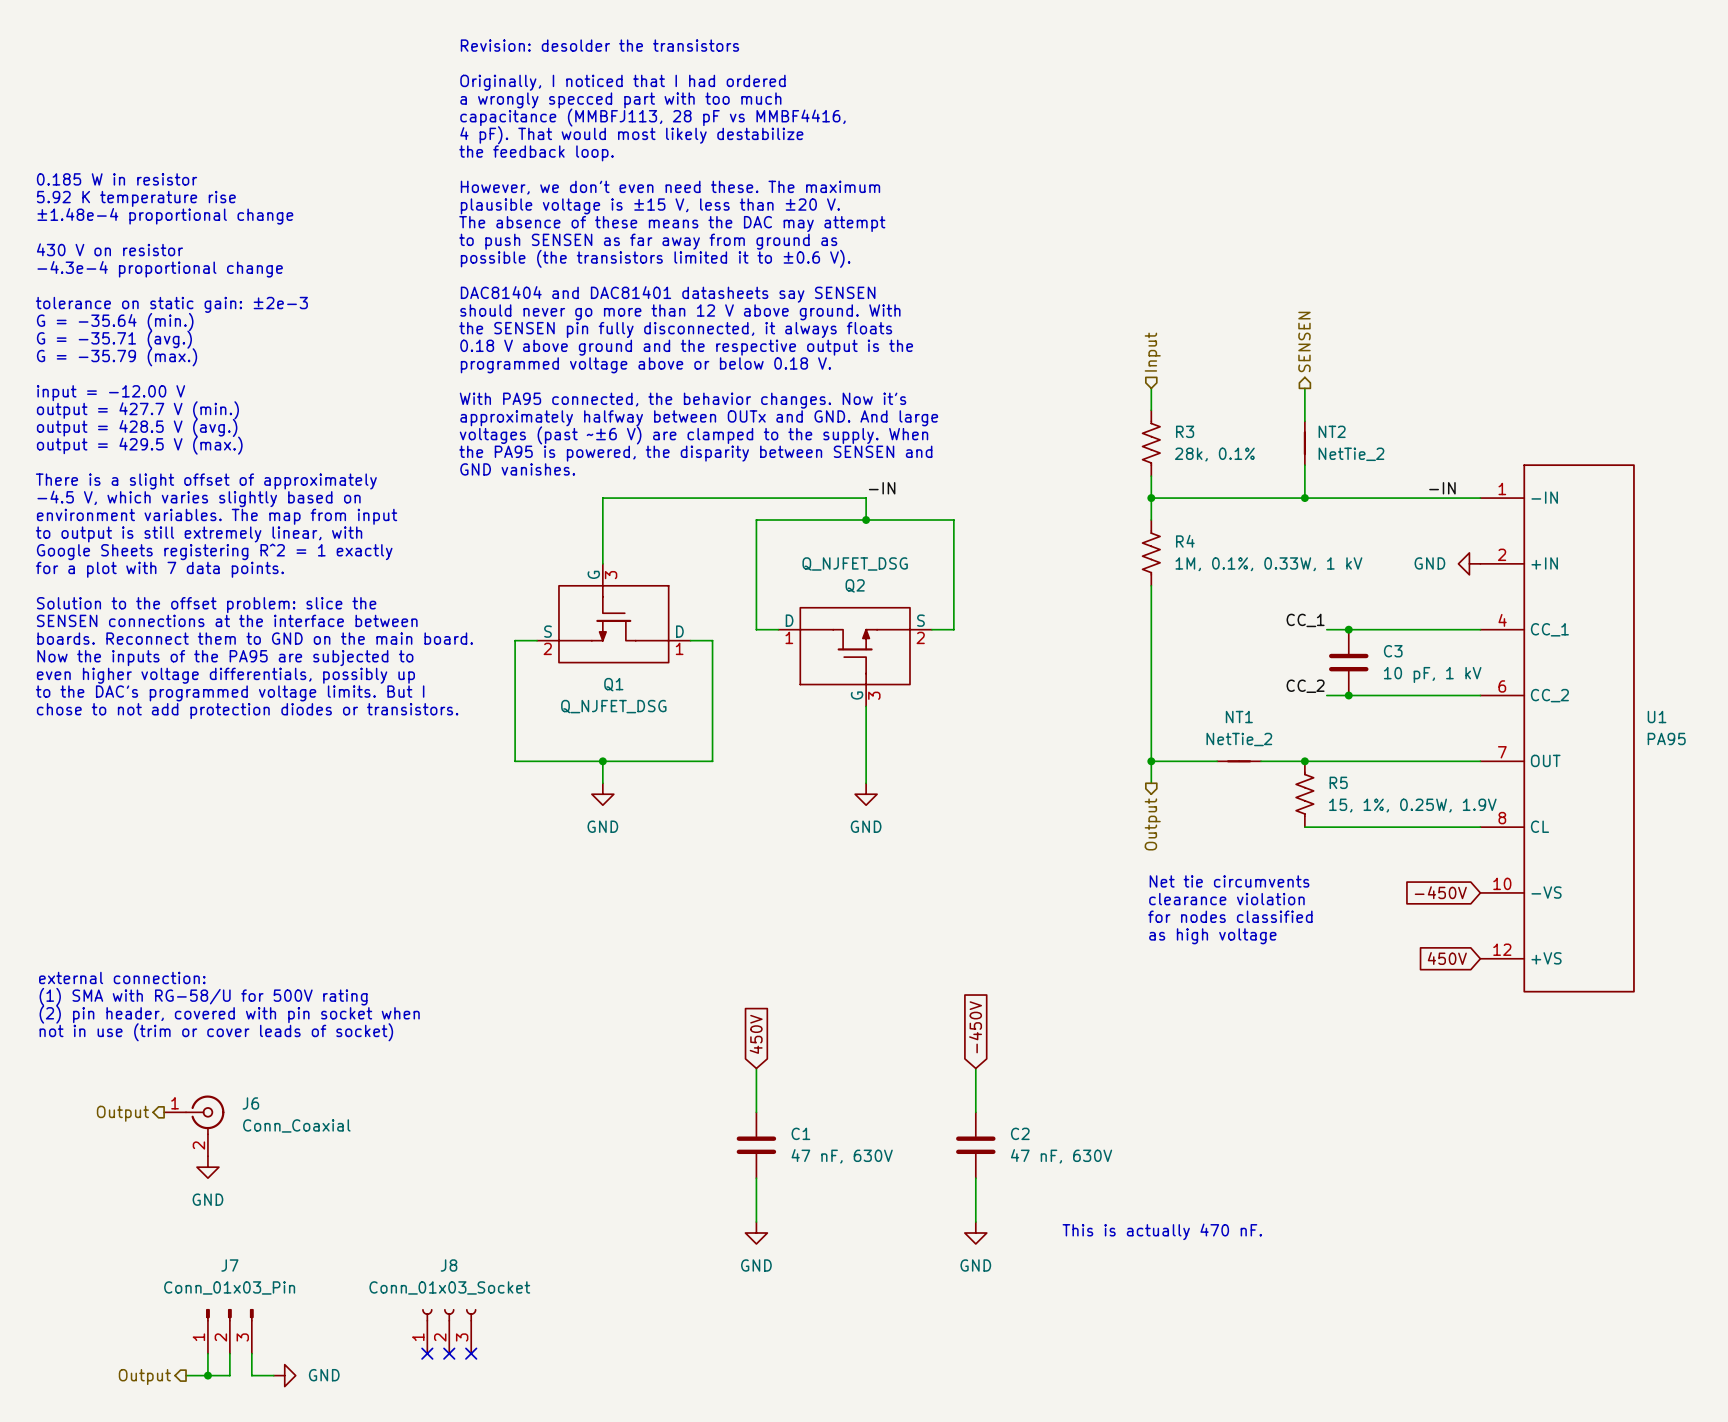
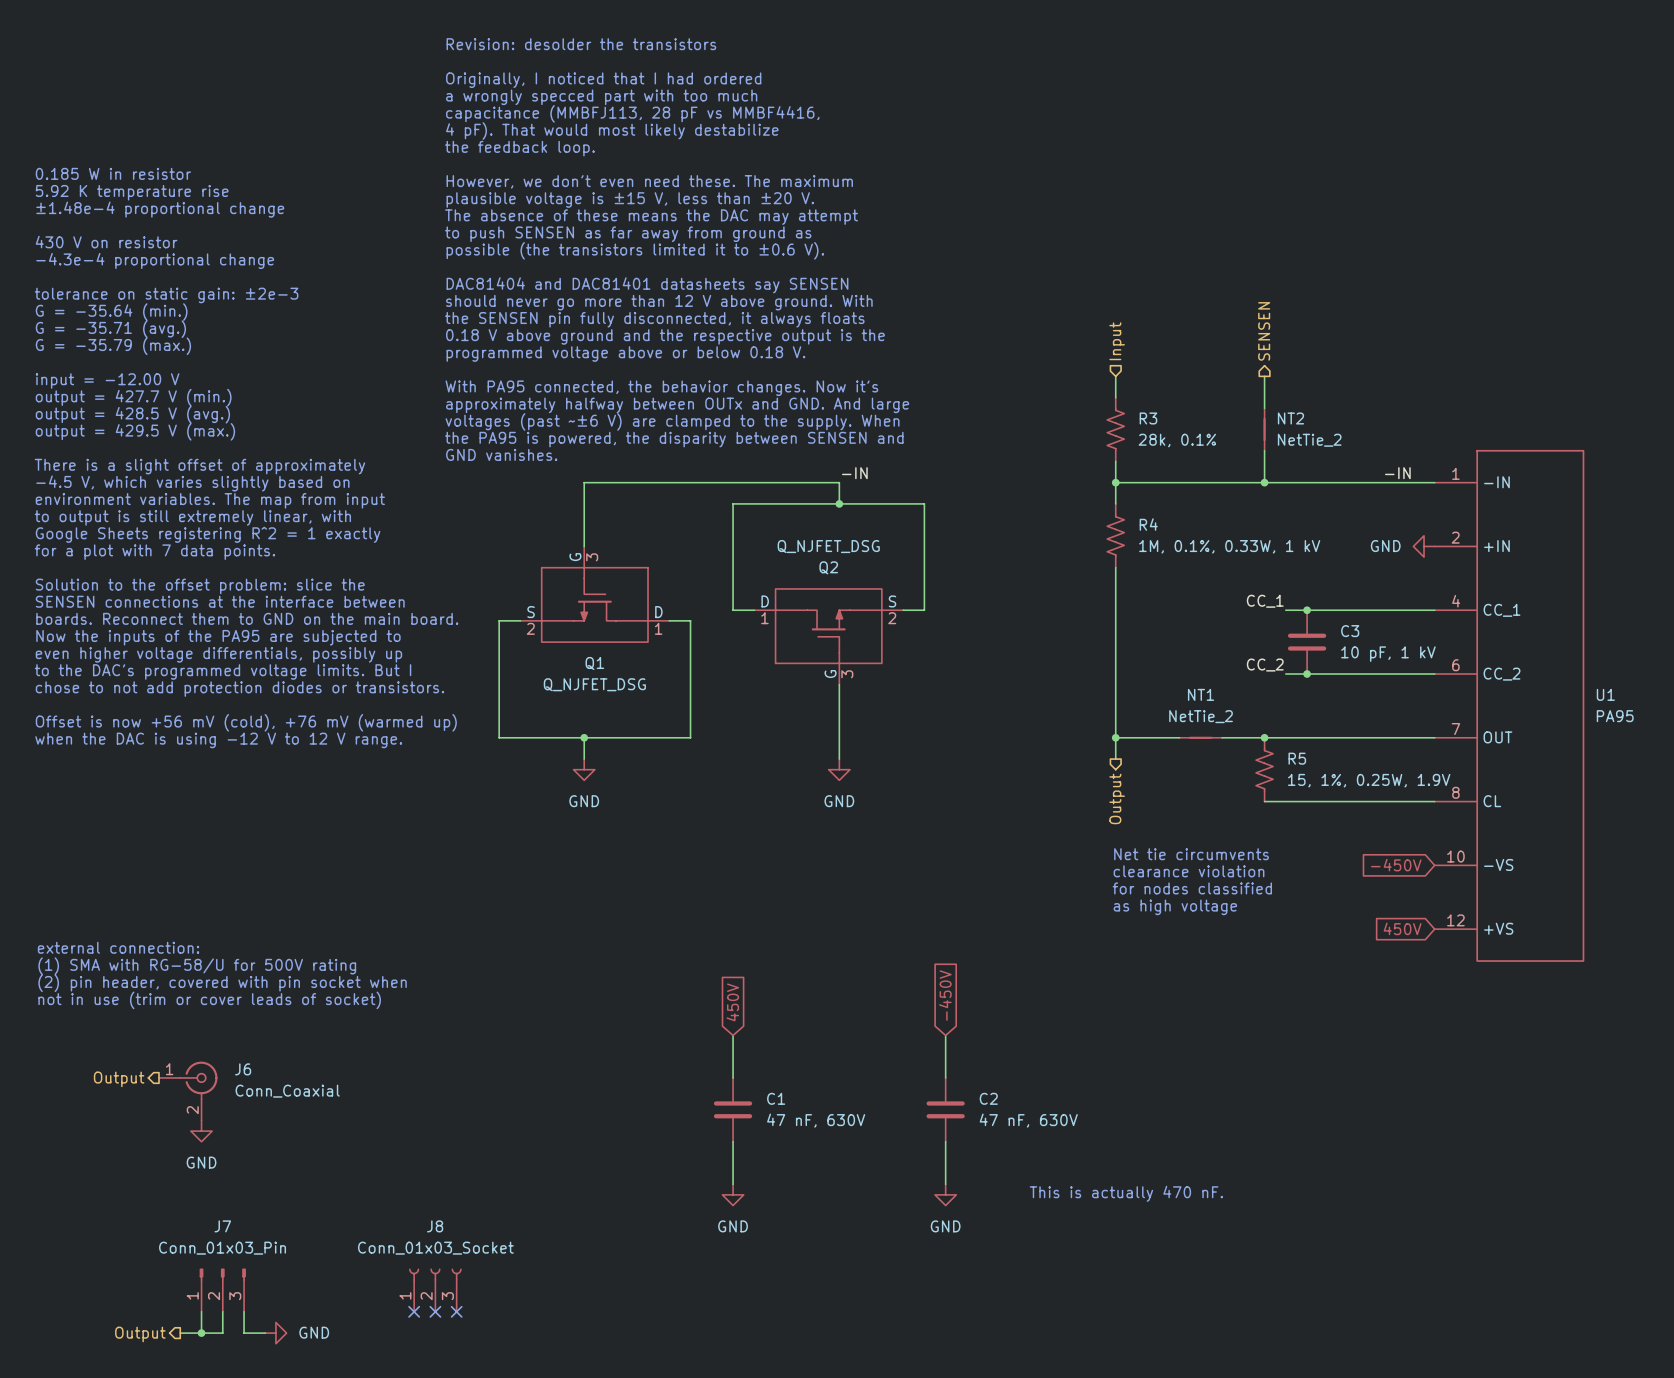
text: none -> Offset is now +56 mV (cold), +76 mV (warmed up) (246, 722)
text: none -> when the DAC is using -12 V to 12 V range. (218, 740)

